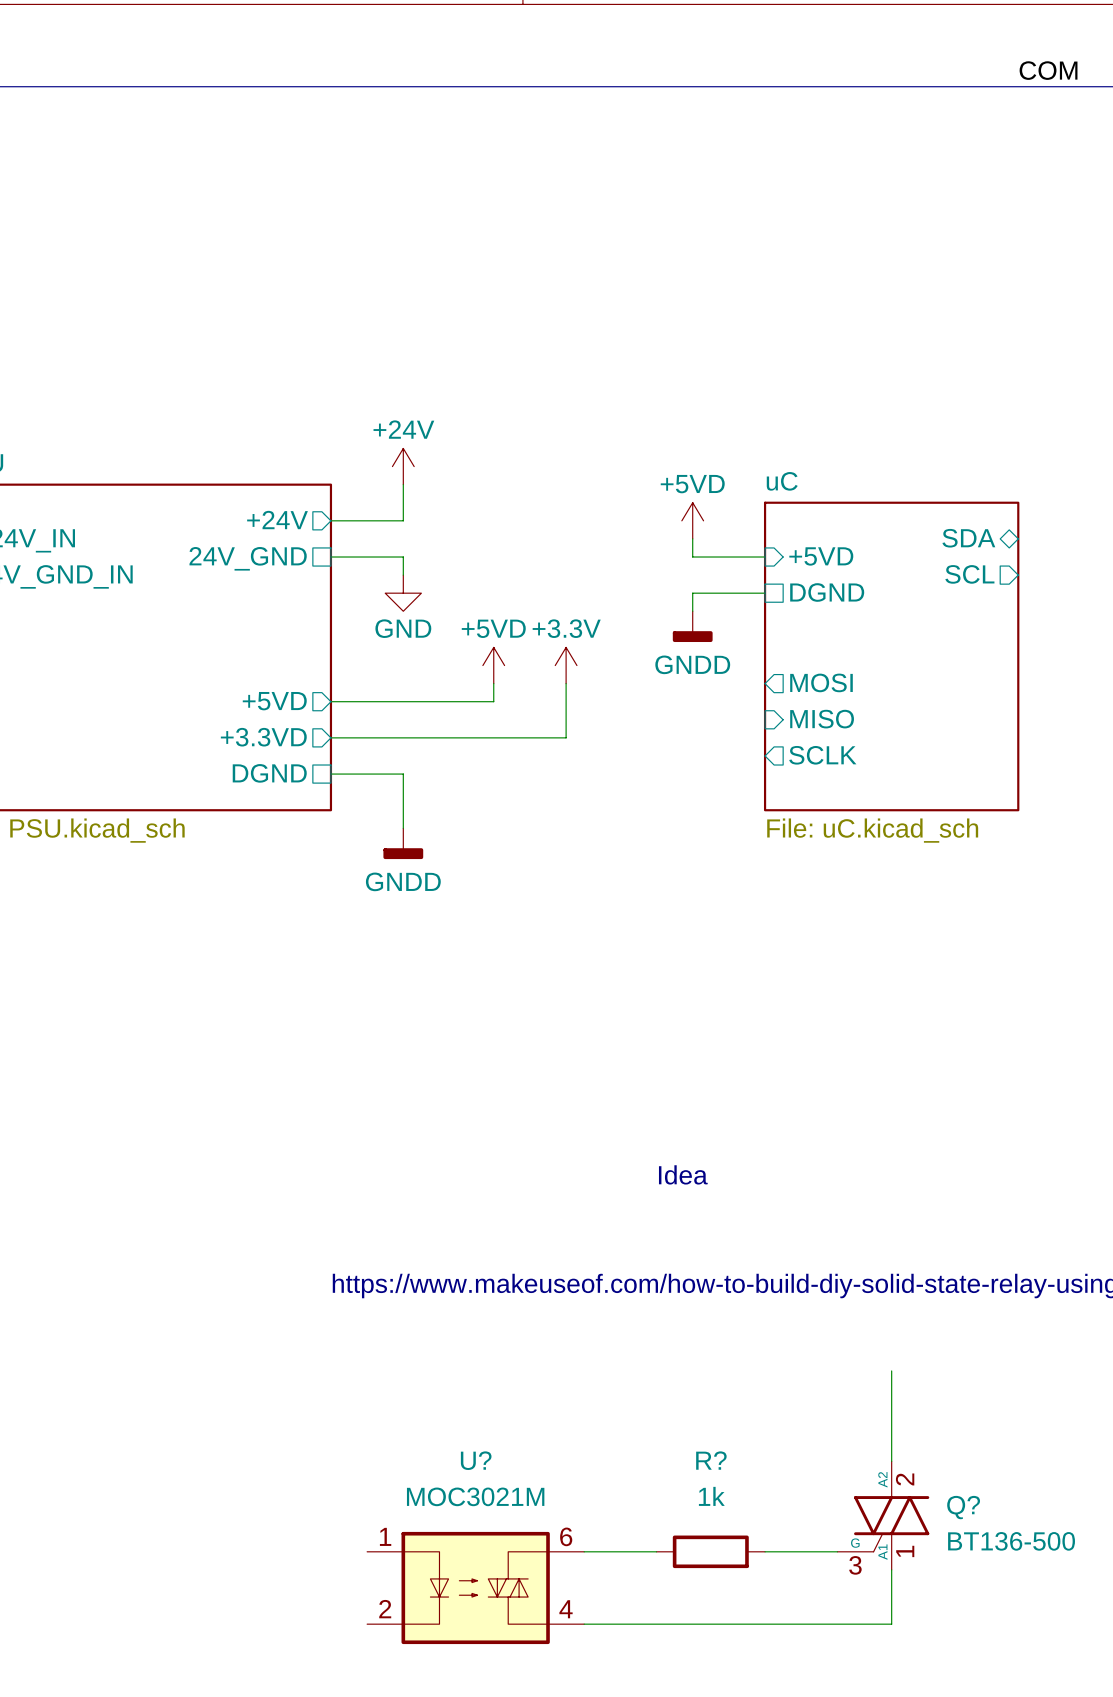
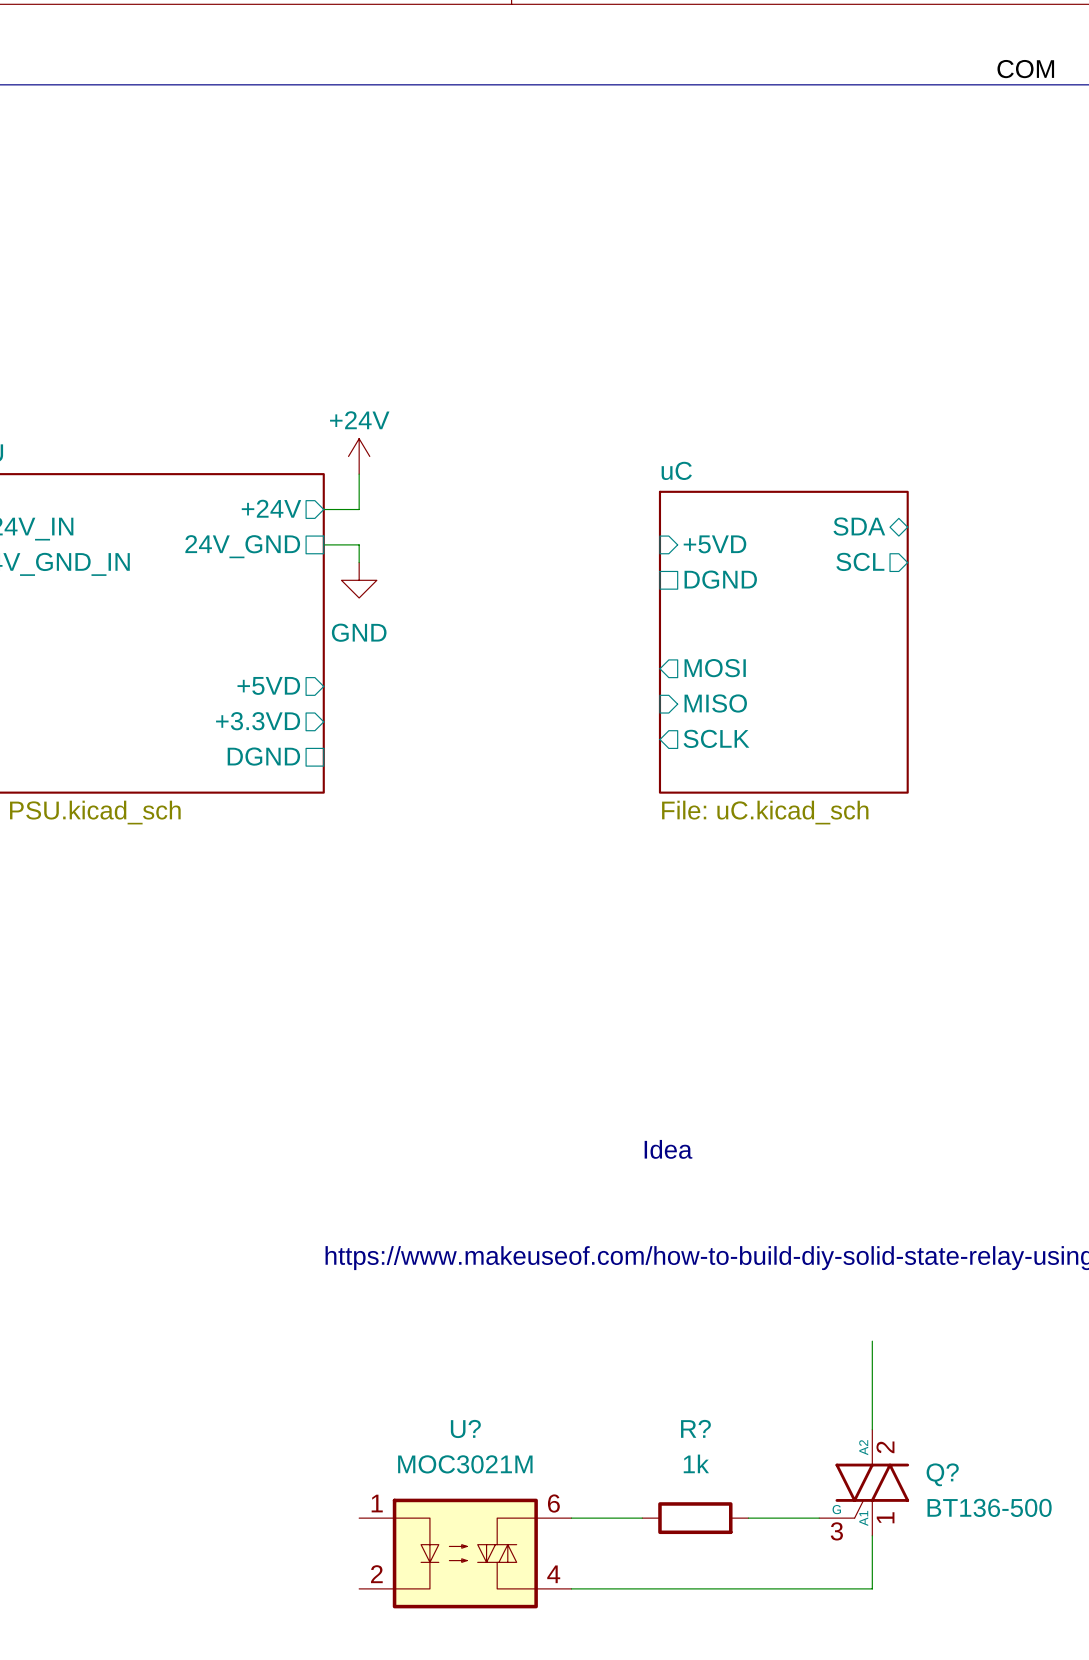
power symbol position: +24V (403, 466) -> +24V (359, 456)
wire: (403, 484) (403, 520) (367, 520) -> (359, 474) (359, 509)
power symbol: +5VD (692, 520) -> none
wire: (692, 538) (692, 557) (765, 557) -> none
sheet pin position: SDA (968, 538) -> SDA (859, 526)
sheet pin position: +5VD (821, 556) -> +5VD (714, 544)
wire: (367, 557) (403, 557) (403, 575) -> (359, 544) (359, 562)
sheet pin position: SCL (969, 574) -> SCL (860, 561)
sheet pin position: DGND (827, 592) -> DGND (720, 579)
power symbol position: GND (403, 593) -> GND (359, 580)
wire: (765, 593) (692, 593) (692, 611) -> none
power symbol: GNDD (692, 626) -> none
power symbol text position: GND (403, 628) -> GND (359, 632)
sheet uC position: (891, 656) -> (783, 642)
power symbol: +5VD (493, 665) -> none
power symbol: +3.3V (566, 665) -> none
sheet pin position: MOSI (821, 682) -> MOSI (715, 668)
wire: (493, 683) (493, 701) (330, 701) -> none
wire: (566, 683) (566, 737) (330, 737) -> none
sheet pin position: MISO (822, 719) -> MISO (715, 703)
sheet pin position: SCLK (822, 755) -> SCLK (716, 738)
wire: (330, 774) (403, 774) (403, 828) -> none
power symbol: GNDD (403, 843) -> none

